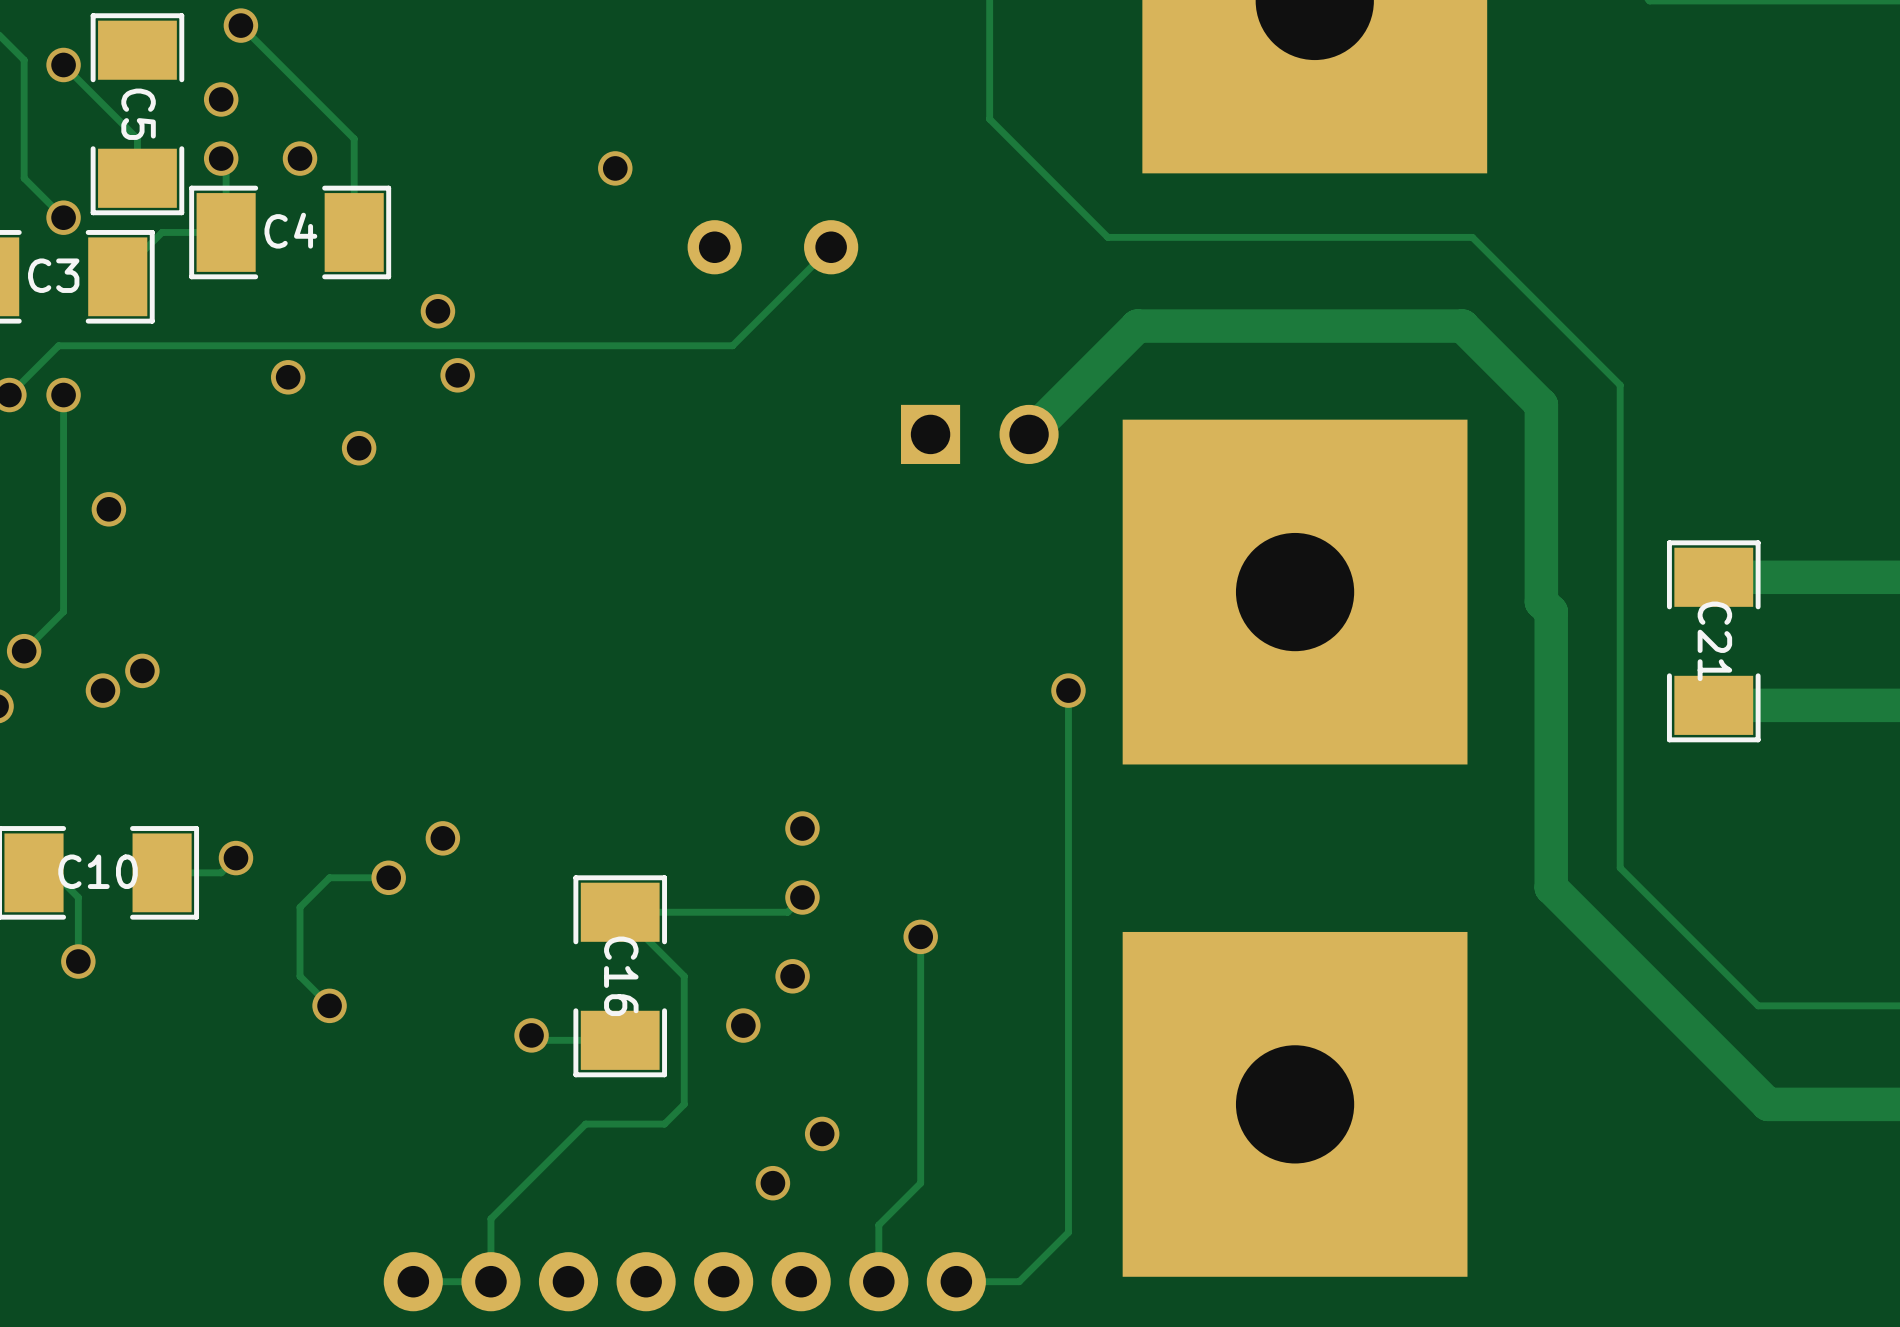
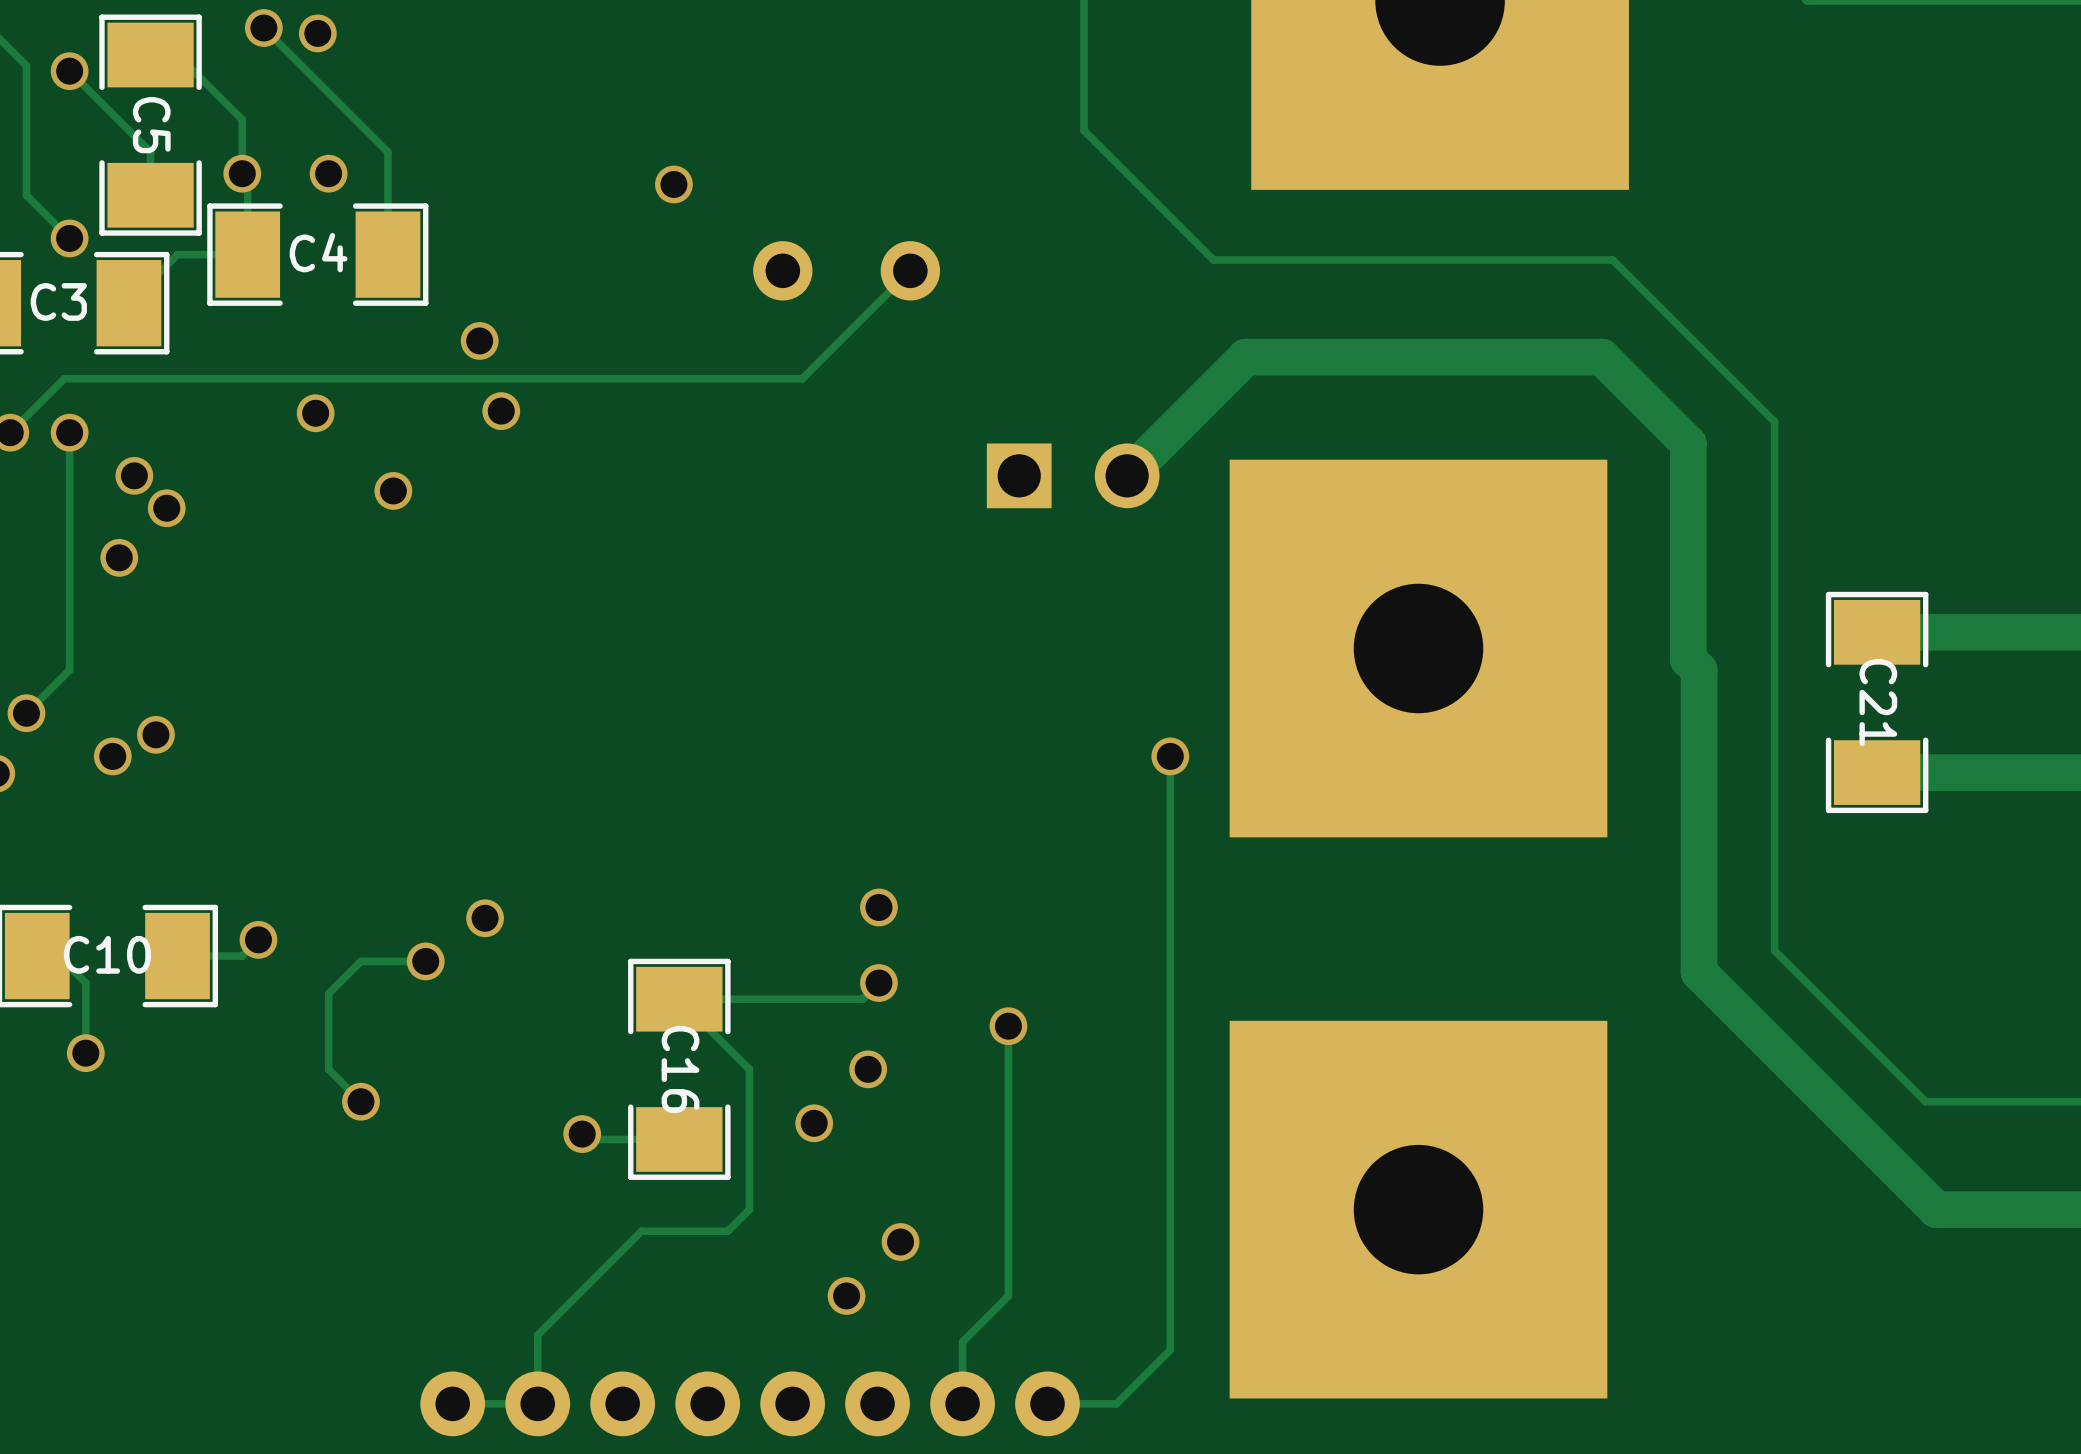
track: none -> (150, 54) (177, 54) (242, 119) (242, 173)
via position: (221, 99) -> (317, 33)
via: none -> (134, 475)
via: none -> (166, 508)

